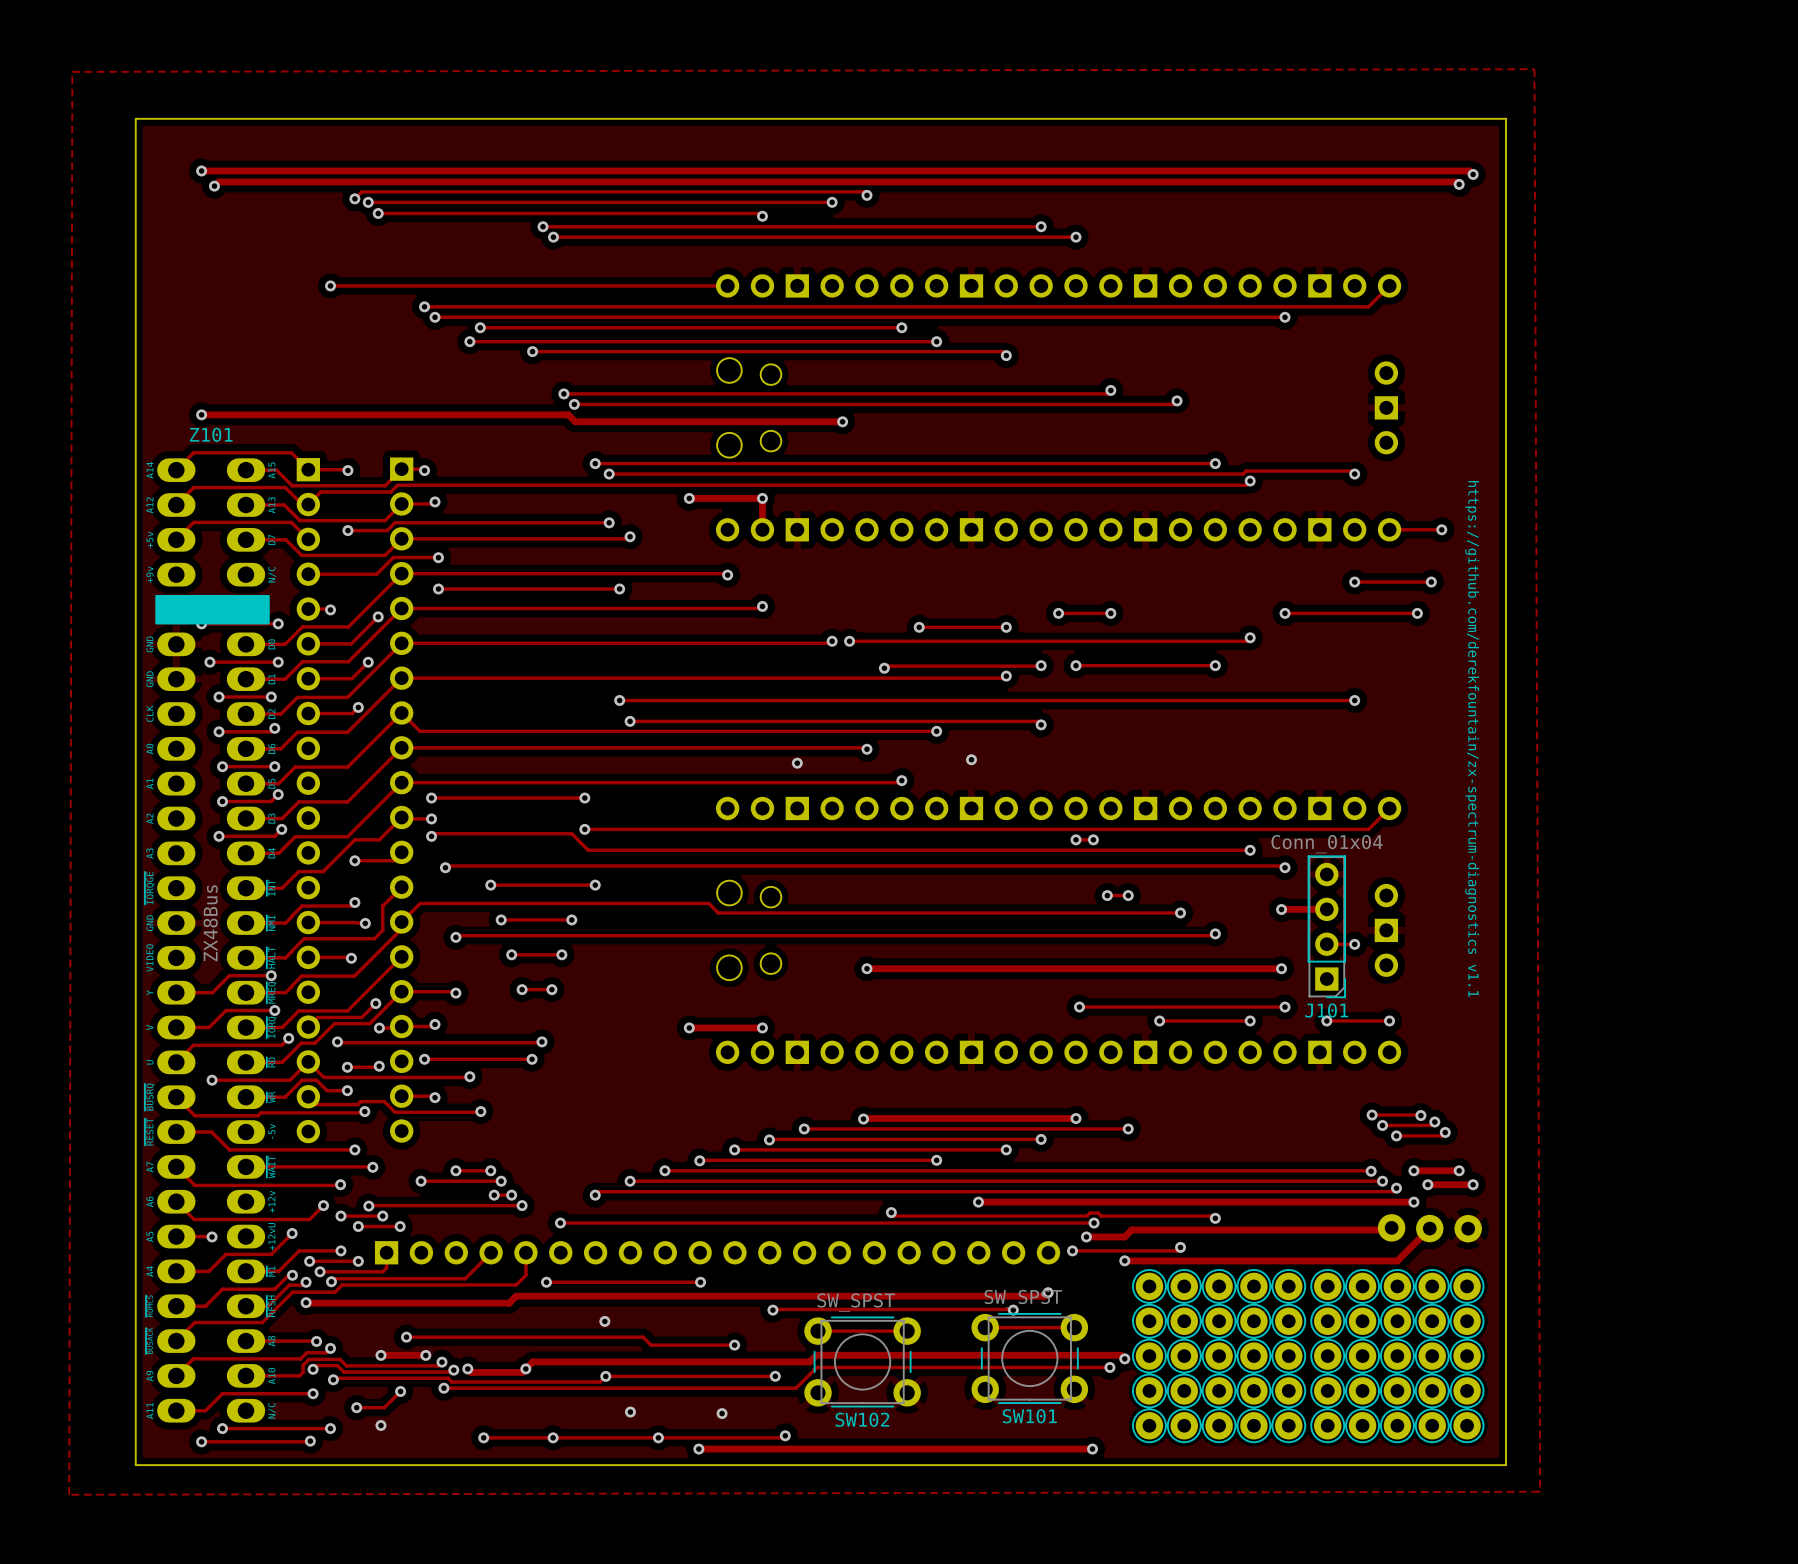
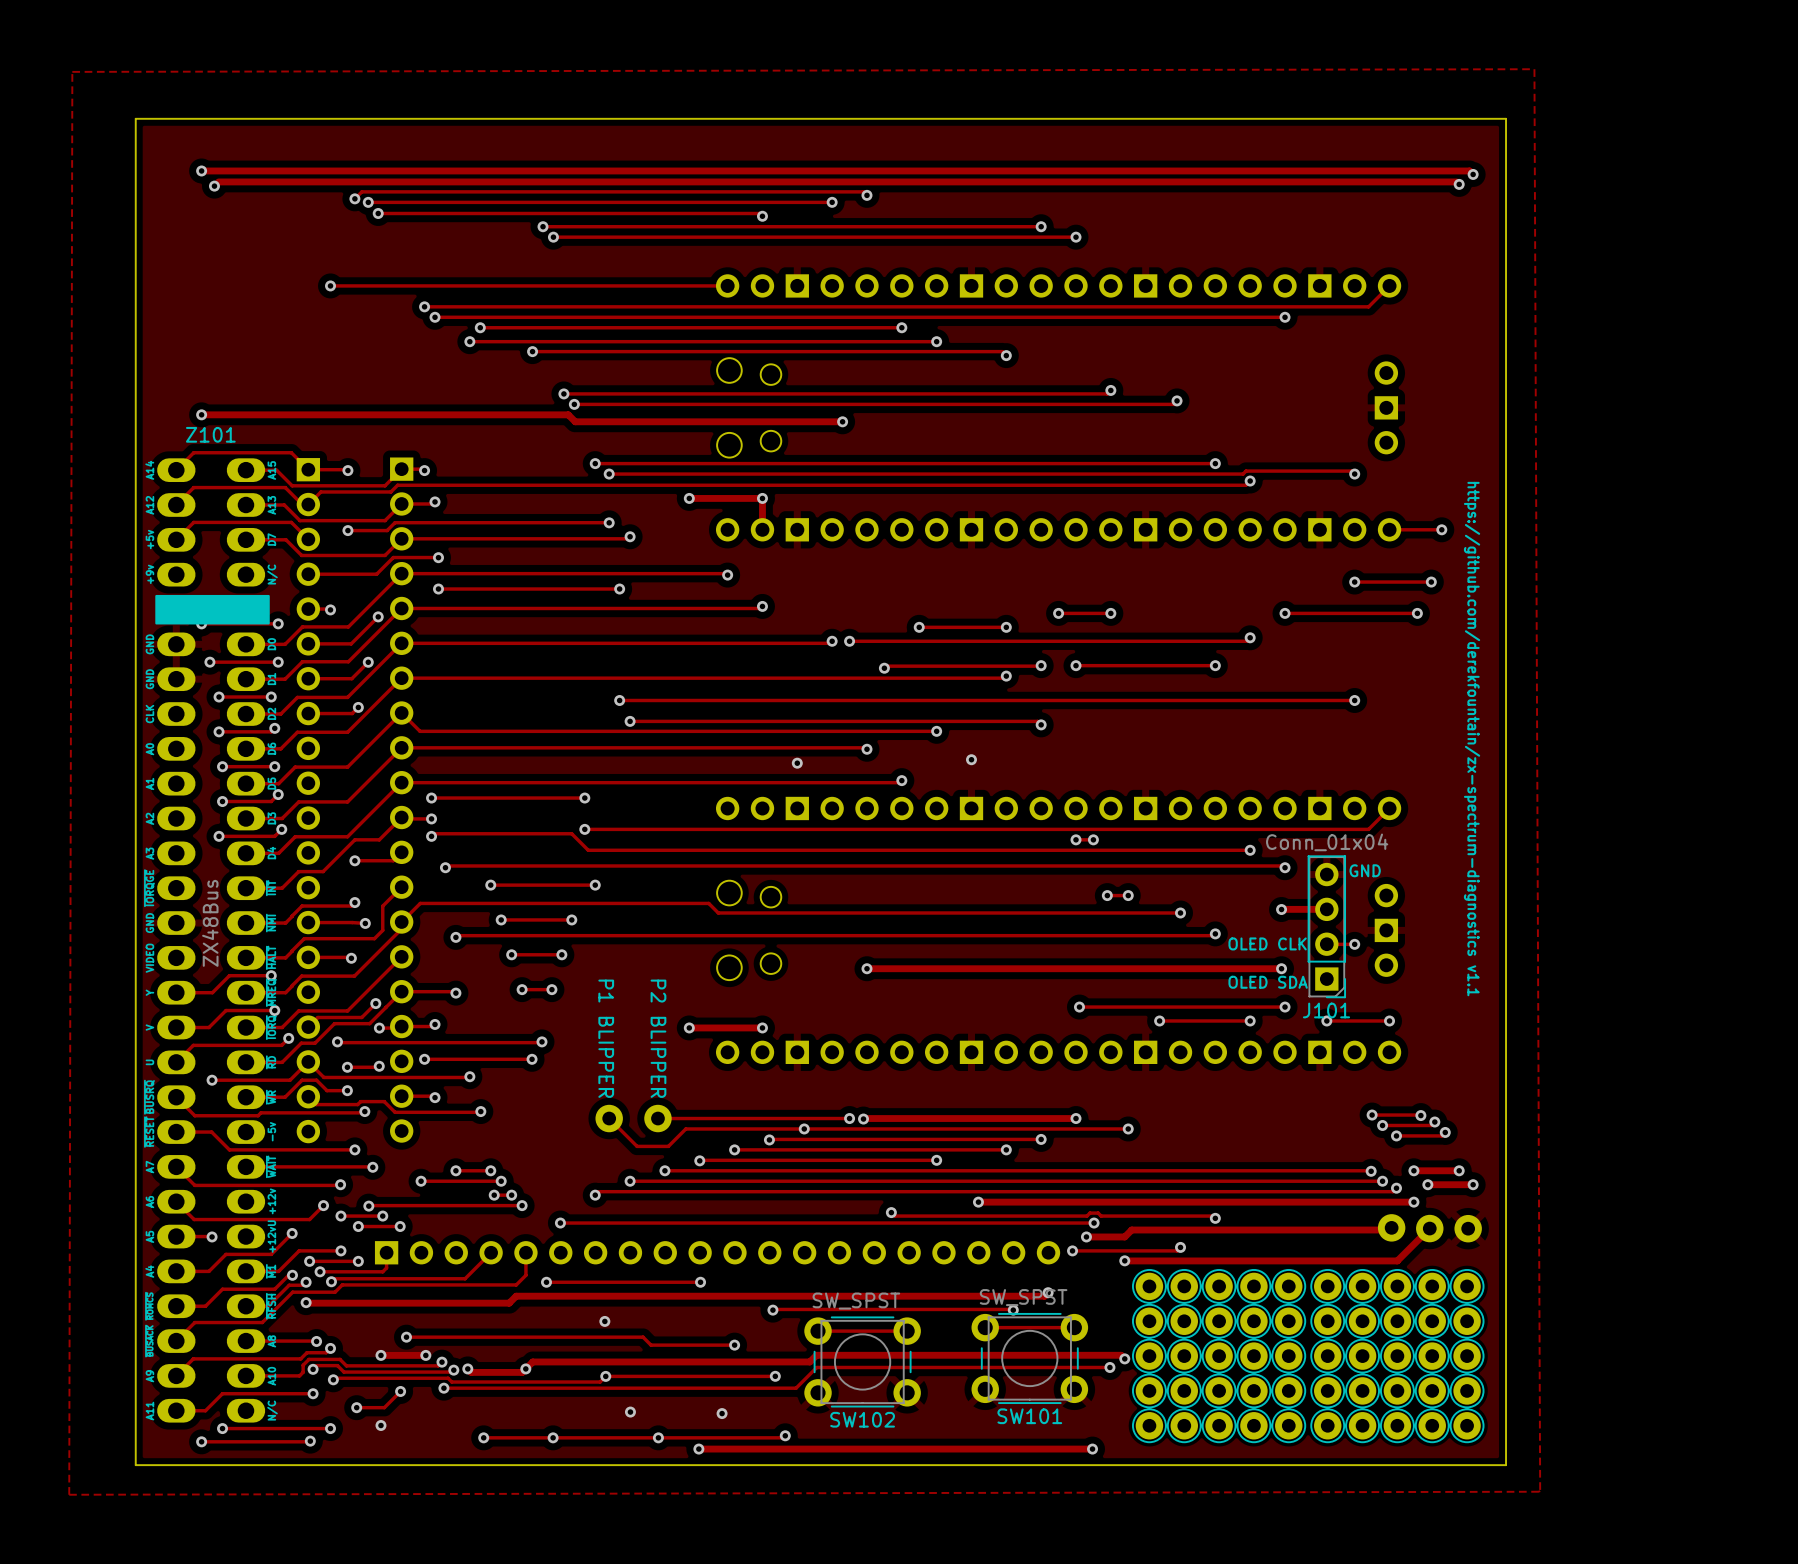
text: none -> GND (1365, 870)
text: none -> OLED CLK (1267, 943)
text: none -> OLED SDA (1268, 982)
text: none -> P1 BLIPPER (606, 1038)
text: none -> P2 BLIPPER (658, 1038)
track: none -> (609, 1118) (637, 1146) (668, 1146) (685, 1128) (804, 1128)
part: none -> (609, 1118)
track: none -> (657, 1118) (849, 1118)
part: none -> (657, 1118)
via: none -> (849, 1118)

